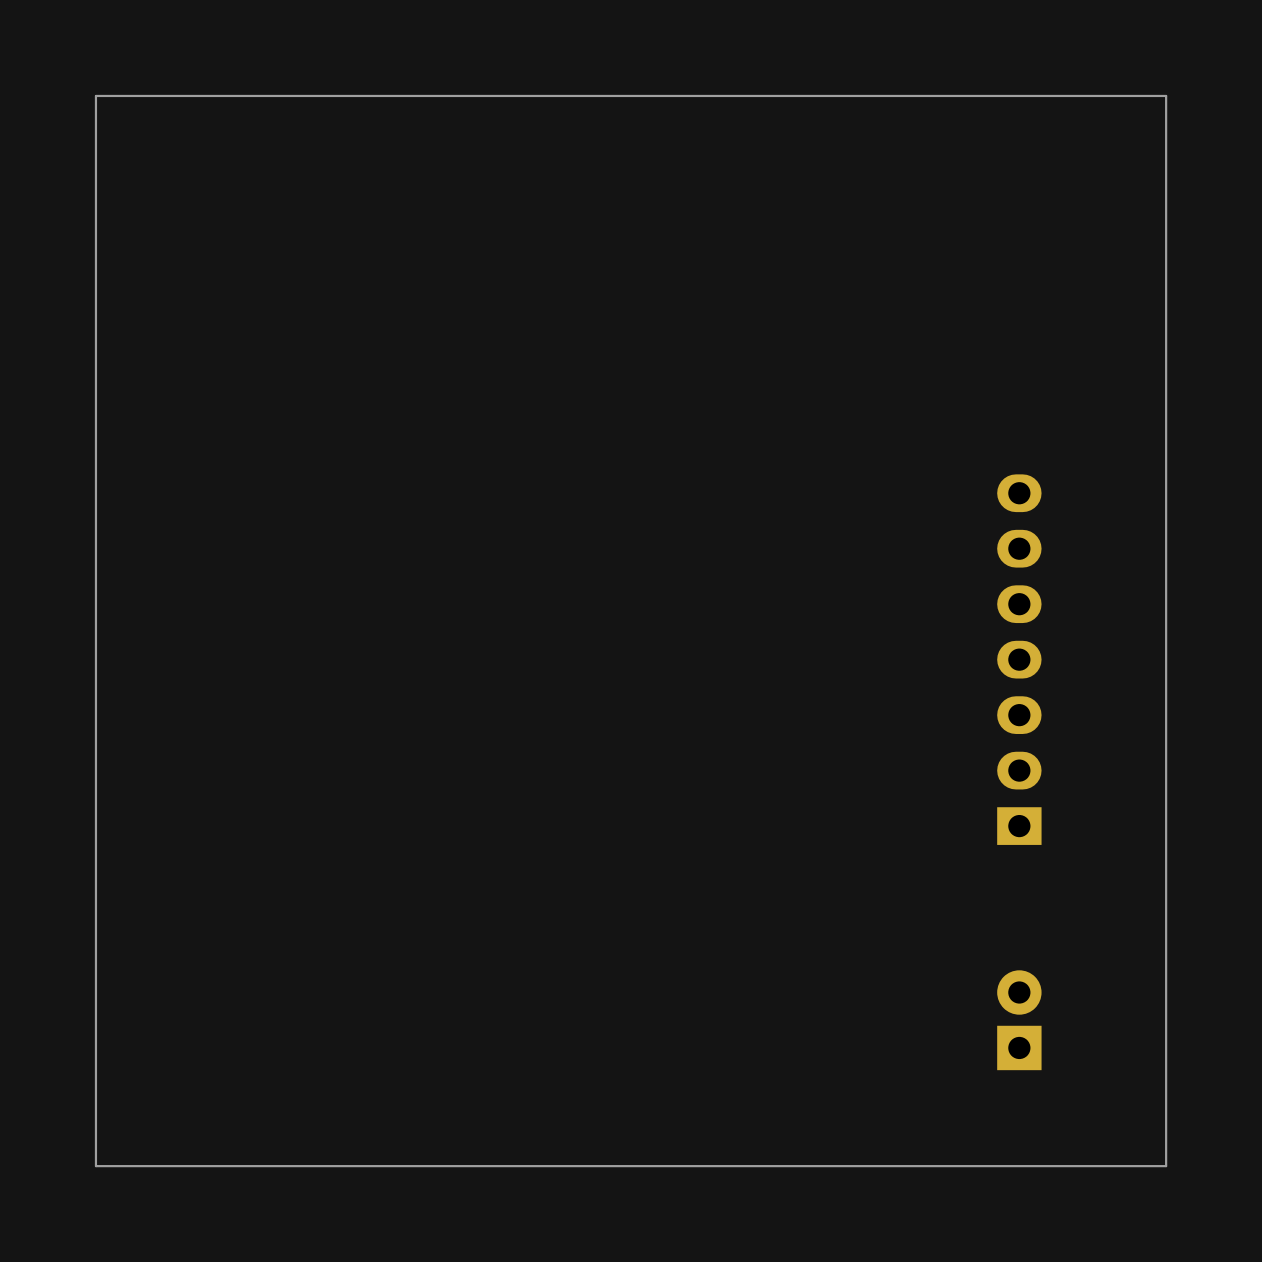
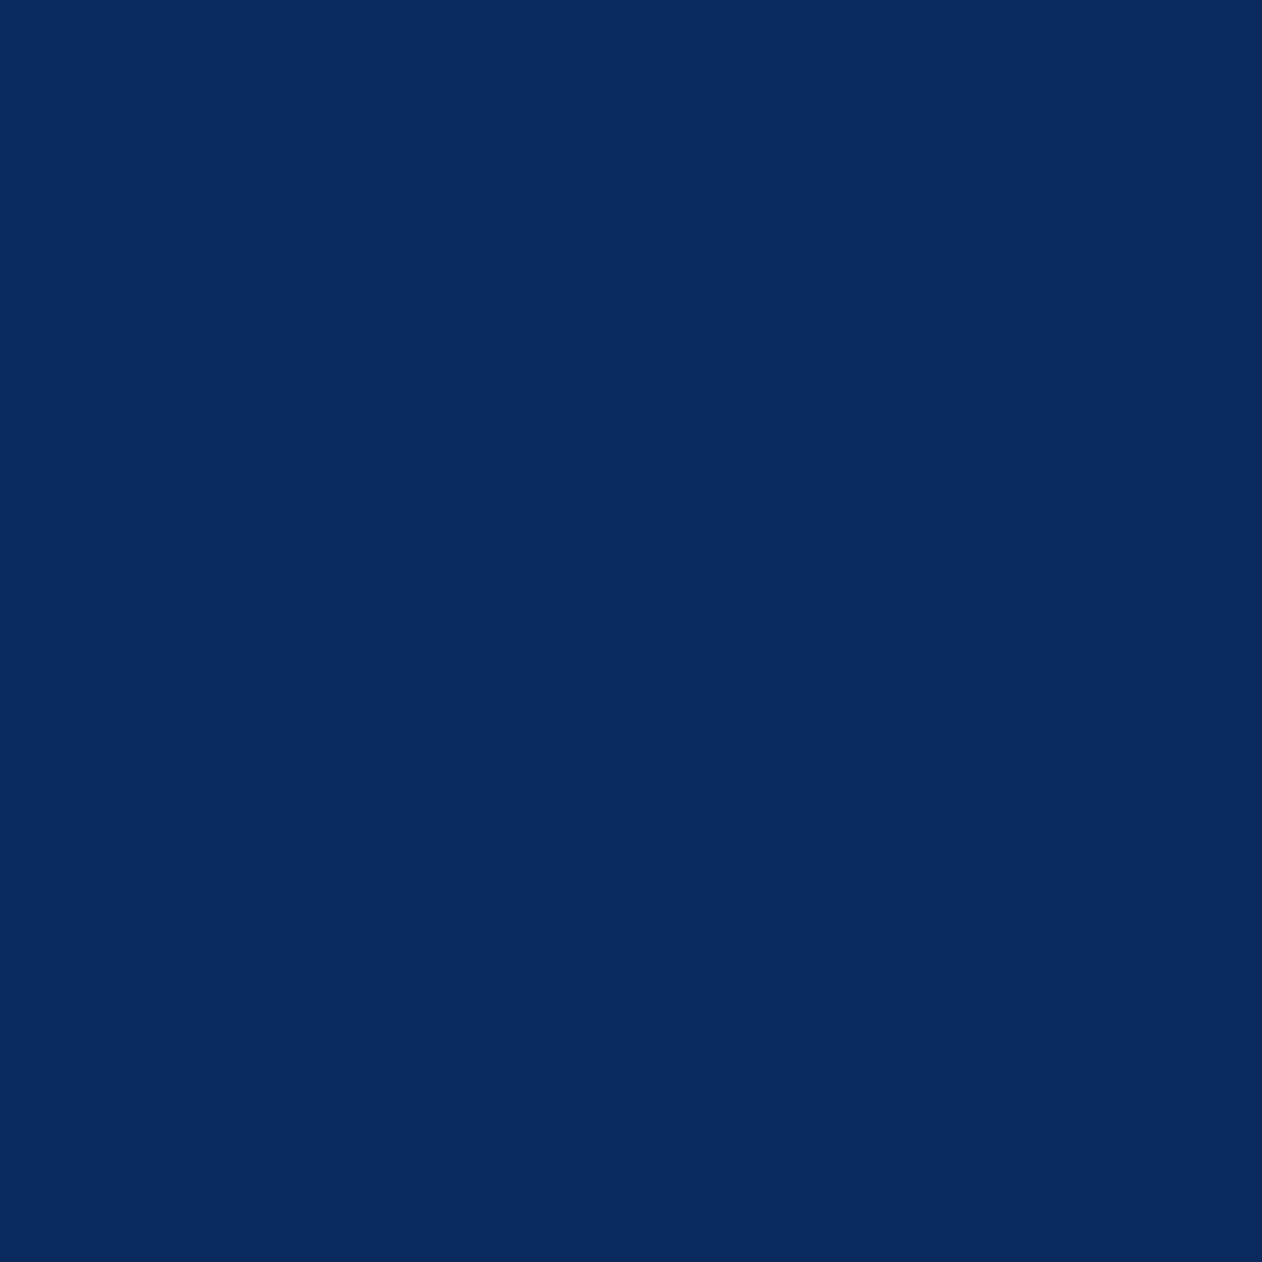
board edge: (1166, 95) (95, 95) (95, 1166) (1166, 1166) (1166, 95) -> none
part: (1019, 659) -> none
part: (1019, 1020) -> none

